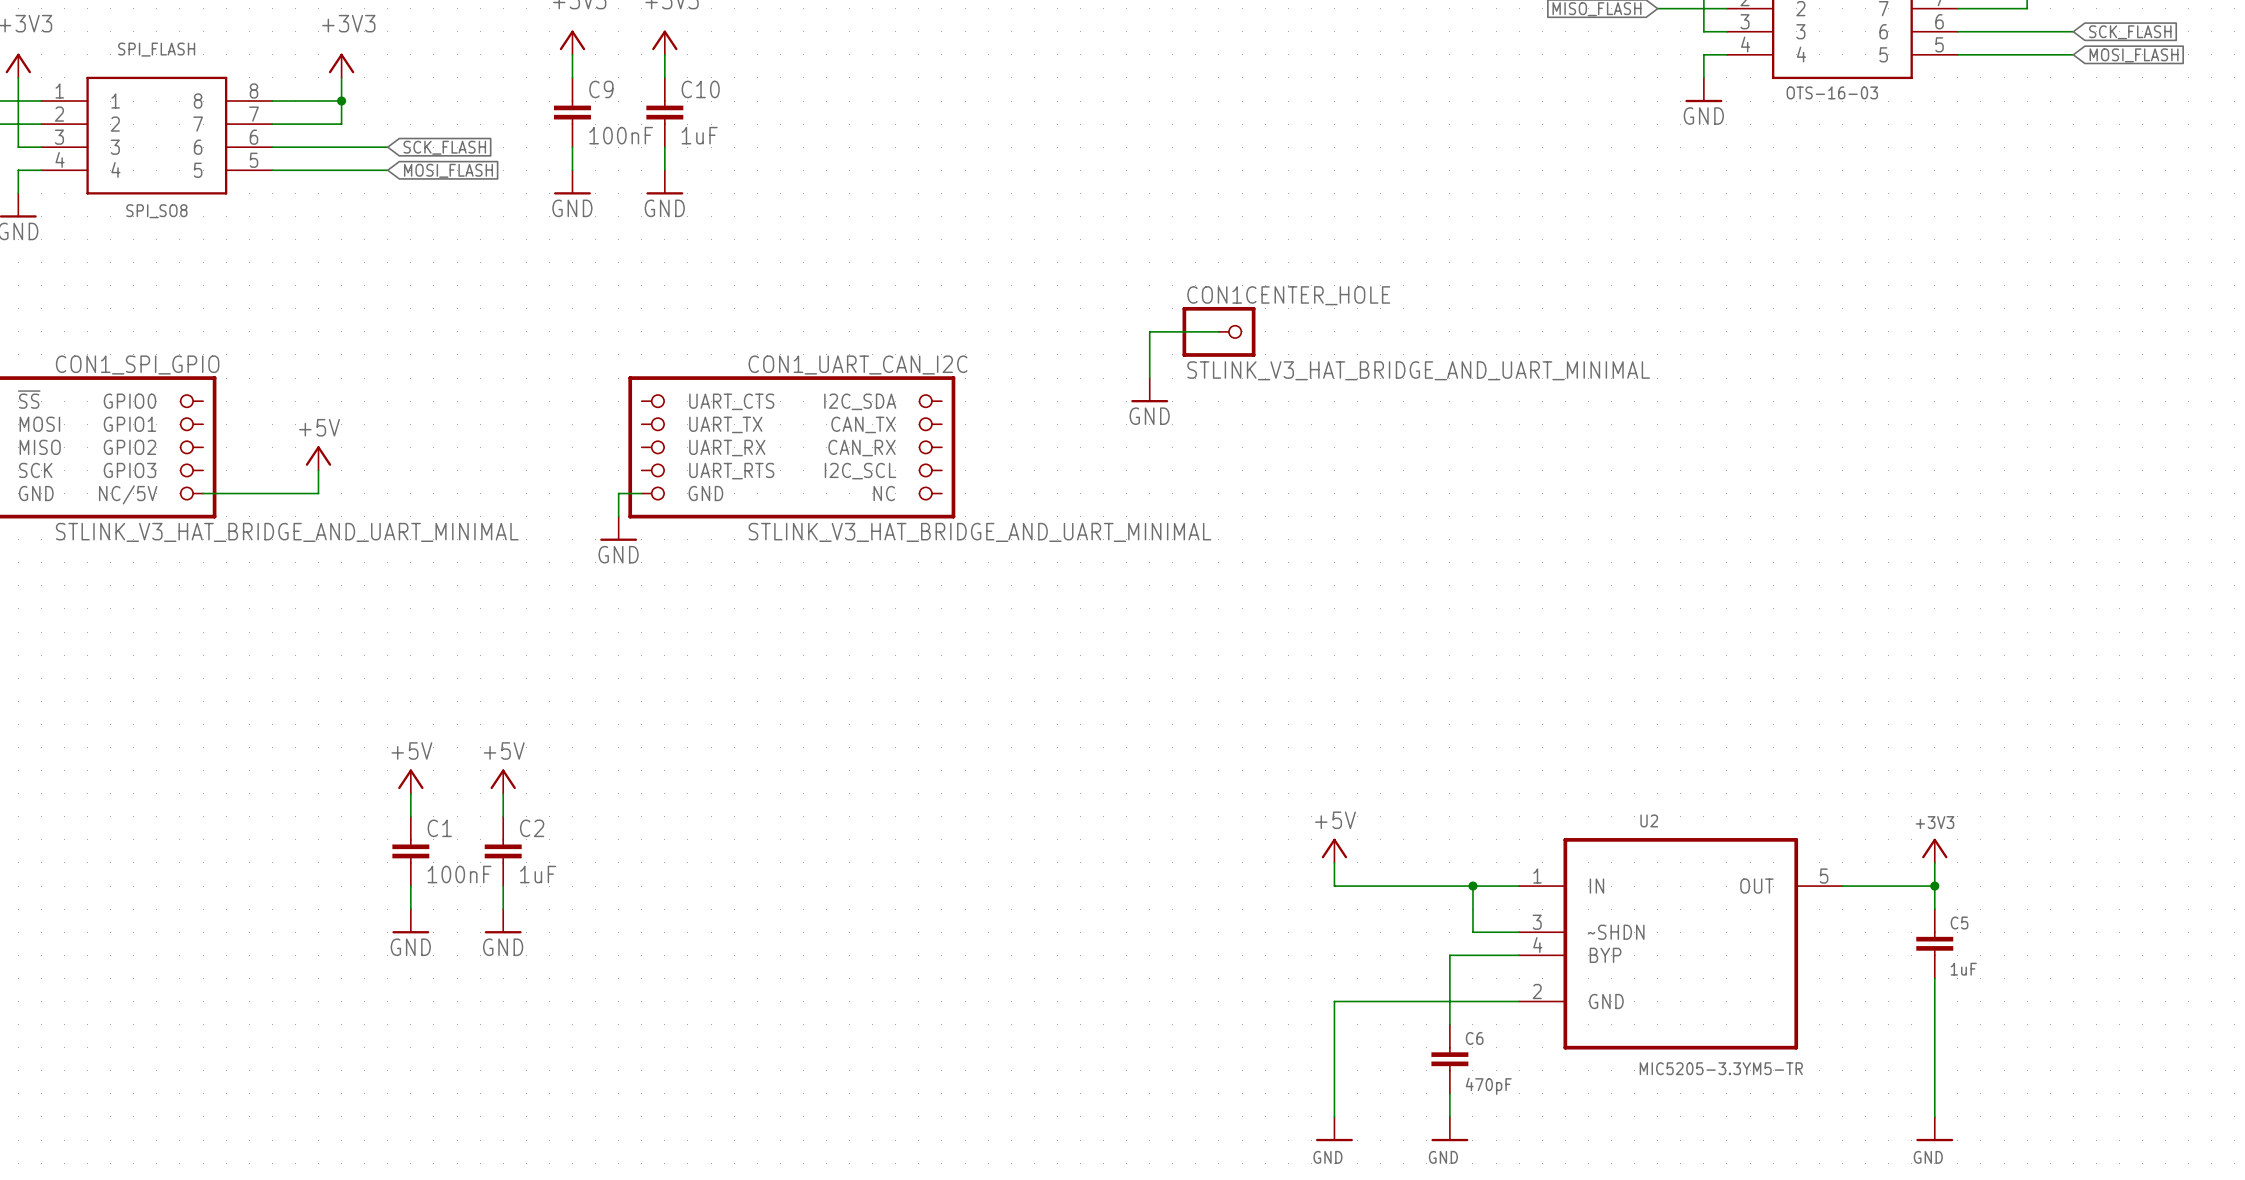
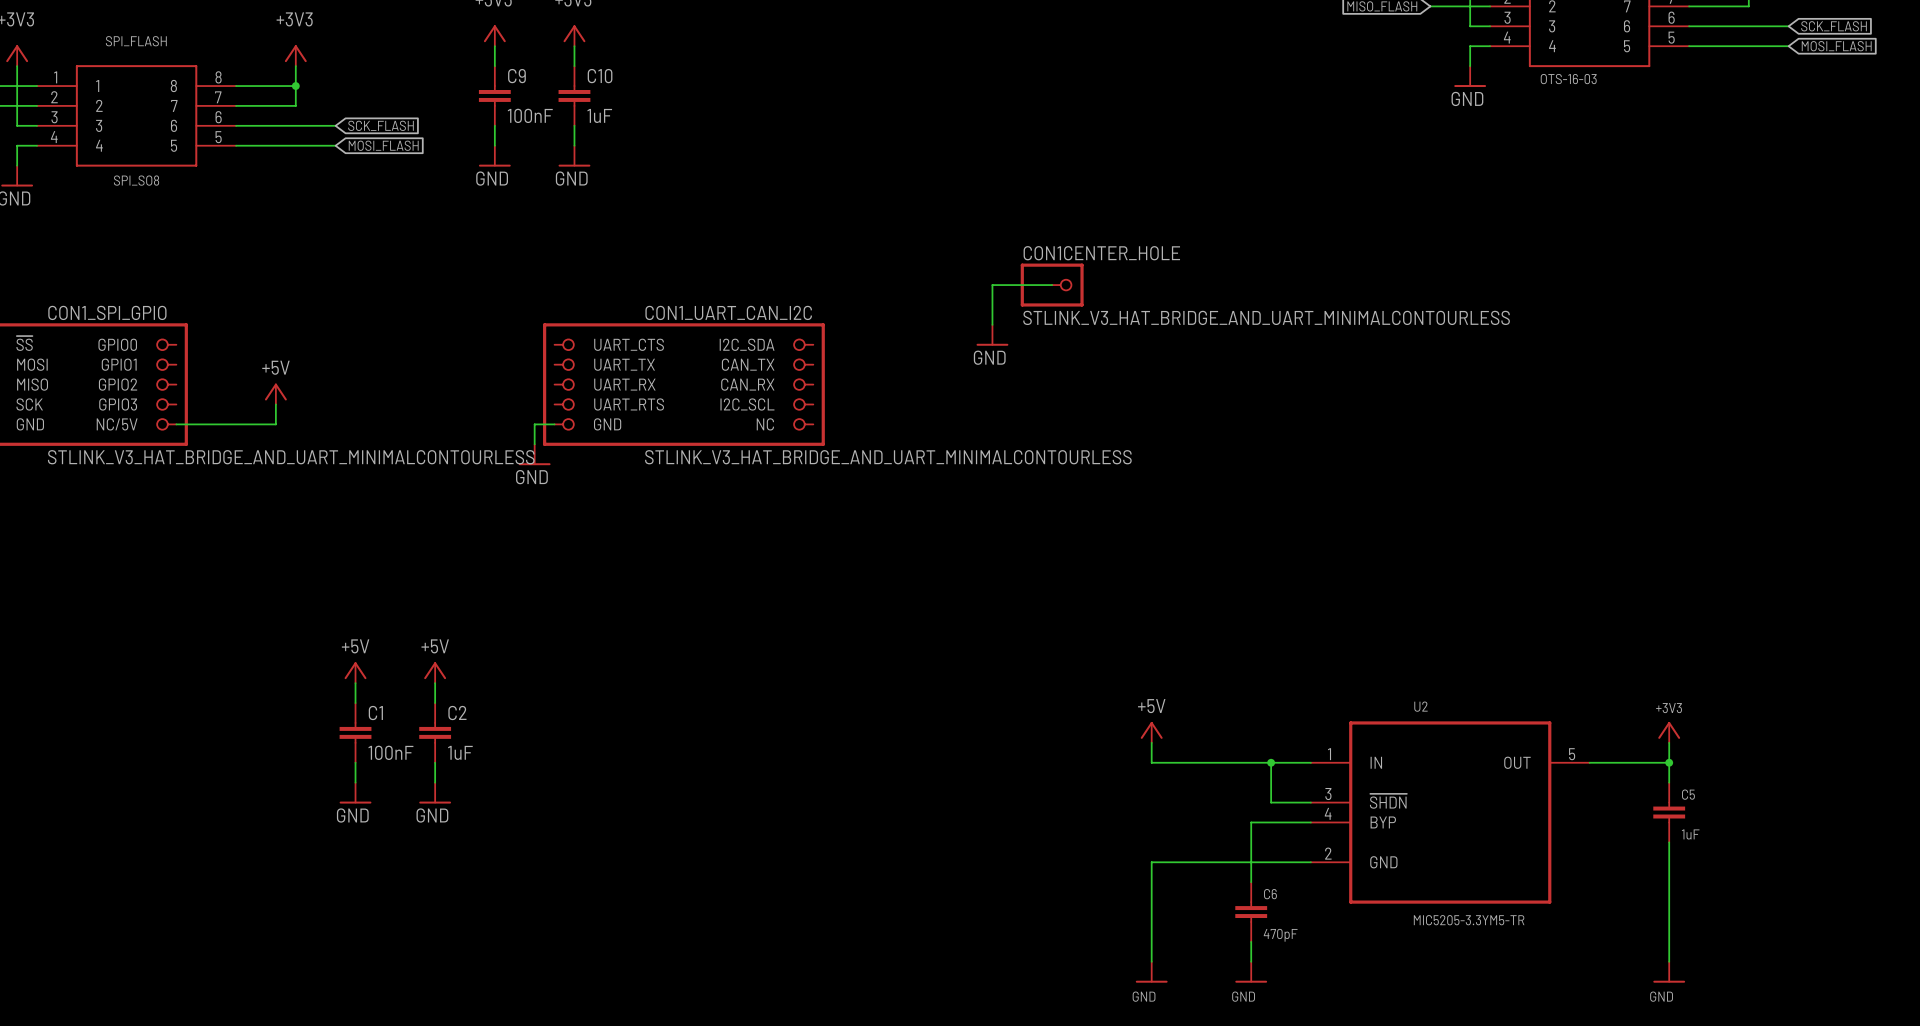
CON1CENTER_HOLE value: STLINK_V3_HAT_BRIDGE_AND_UART_MINIMAL (1418, 370) -> STLINK_V3_HAT_BRIDGE_AND_UART_MINIMALCONTOURLESS (1266, 317)
CON1_SPI_GPIO value: STLINK_V3_HAT_BRIDGE_AND_UART_MINIMAL (287, 532) -> STLINK_V3_HAT_BRIDGE_AND_UART_MINIMALCONTOURLESS (291, 457)
CON1_UART_CAN_I2C value: STLINK_V3_HAT_BRIDGE_AND_UART_MINIMAL (979, 532) -> STLINK_V3_HAT_BRIDGE_AND_UART_MINIMALCONTOURLESS (888, 457)
U2 pin name: ~SHDN (1616, 932) -> ~{SHDN} (1388, 801)

